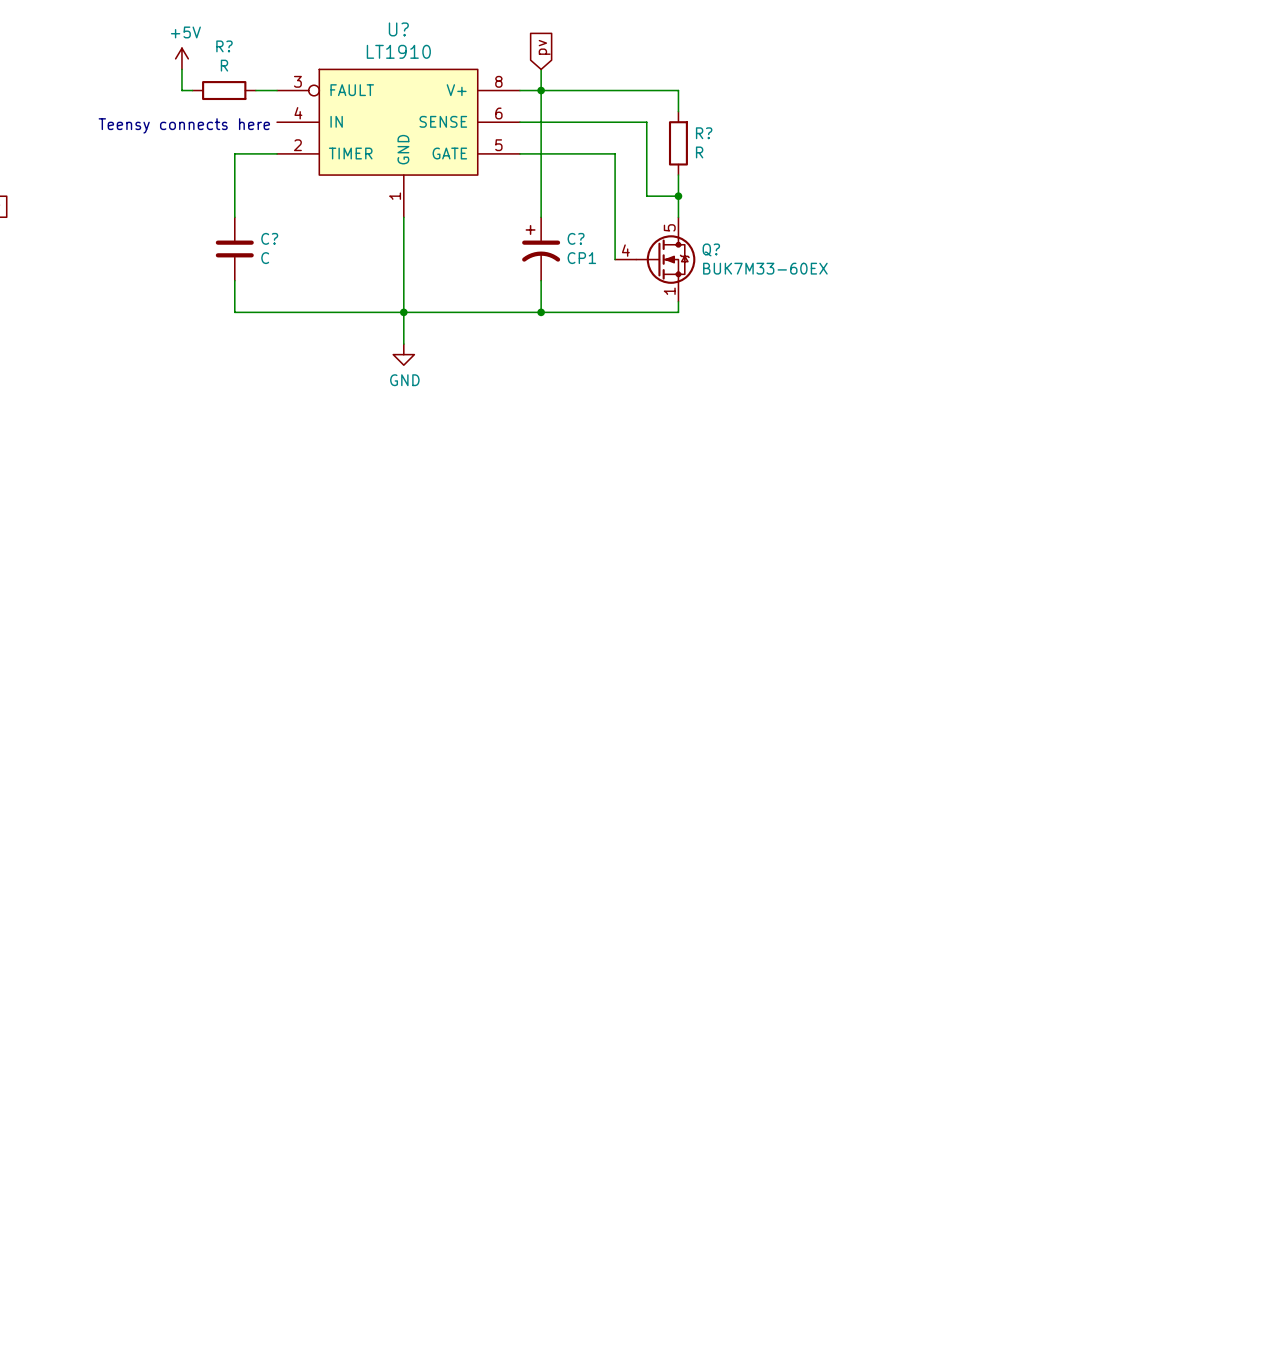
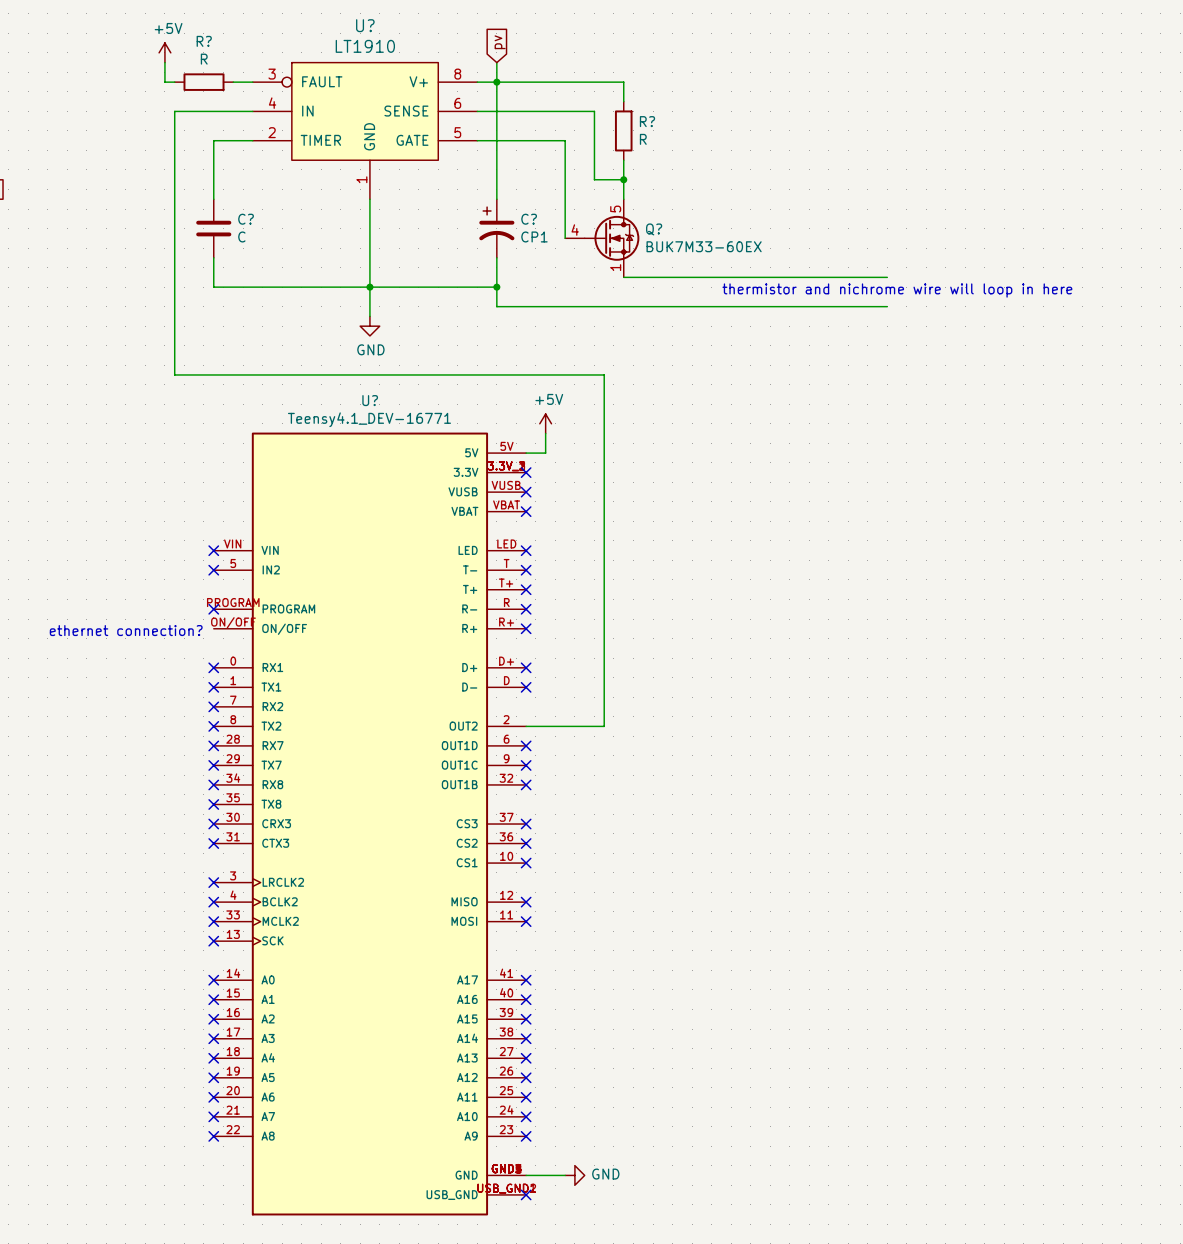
wire: none -> (252, 111) (174, 111) (174, 374) (604, 374) (604, 726) (526, 726)
text: Teensy connects here (184, 125) -> none
wire: (678, 301) (678, 312) (541, 312) -> (887, 306) (496, 306) (496, 287)
wire: none -> (623, 277) (887, 277)
text: none -> thermistor and nichrome wire will loop in here (897, 290)
power symbol: none -> +5V (545, 423)
wire: none -> (545, 433) (545, 453) (526, 453)
no-connect mark: none -> (526, 472)
no-connect mark: none -> (526, 492)
no-connect mark: none -> (526, 511)
no-connect mark: none -> (213, 550)
no-connect mark: none -> (526, 550)
no-connect mark: none -> (213, 570)
no-connect mark: none -> (526, 570)
no-connect mark: none -> (526, 589)
no-connect mark: none -> (213, 609)
no-connect mark: none -> (526, 609)
no-connect mark: none -> (526, 628)
text: none -> ethernet connection? (126, 630)
no-connect mark: none -> (213, 667)
no-connect mark: none -> (526, 667)
no-connect mark: none -> (213, 687)
no-connect mark: none -> (526, 687)
no-connect mark: none -> (213, 706)
no-connect mark: none -> (213, 726)
no-connect mark: none -> (213, 745)
no-connect mark: none -> (526, 745)
no-connect mark: none -> (213, 765)
no-connect mark: none -> (526, 765)
no-connect mark: none -> (213, 784)
no-connect mark: none -> (526, 784)
no-connect mark: none -> (213, 804)
no-connect mark: none -> (213, 824)
U?: none -> Teensy4.1_DEV-16771 (369, 824)
no-connect mark: none -> (526, 824)
no-connect mark: none -> (213, 843)
no-connect mark: none -> (526, 843)
no-connect mark: none -> (526, 863)
no-connect mark: none -> (213, 882)
no-connect mark: none -> (213, 902)
no-connect mark: none -> (526, 902)
no-connect mark: none -> (213, 921)
no-connect mark: none -> (526, 921)
no-connect mark: none -> (213, 941)
no-connect mark: none -> (213, 980)
no-connect mark: none -> (526, 980)
no-connect mark: none -> (213, 999)
no-connect mark: none -> (526, 999)
no-connect mark: none -> (213, 1019)
no-connect mark: none -> (526, 1019)
no-connect mark: none -> (213, 1038)
no-connect mark: none -> (526, 1038)
no-connect mark: none -> (213, 1058)
no-connect mark: none -> (526, 1058)
no-connect mark: none -> (213, 1077)
no-connect mark: none -> (526, 1077)
no-connect mark: none -> (213, 1097)
no-connect mark: none -> (526, 1097)
no-connect mark: none -> (213, 1116)
no-connect mark: none -> (526, 1116)
no-connect mark: none -> (213, 1136)
no-connect mark: none -> (526, 1136)
wire: none -> (526, 1175) (565, 1175)
power symbol: none -> GND (574, 1175)
no-connect mark: none -> (526, 1194)

